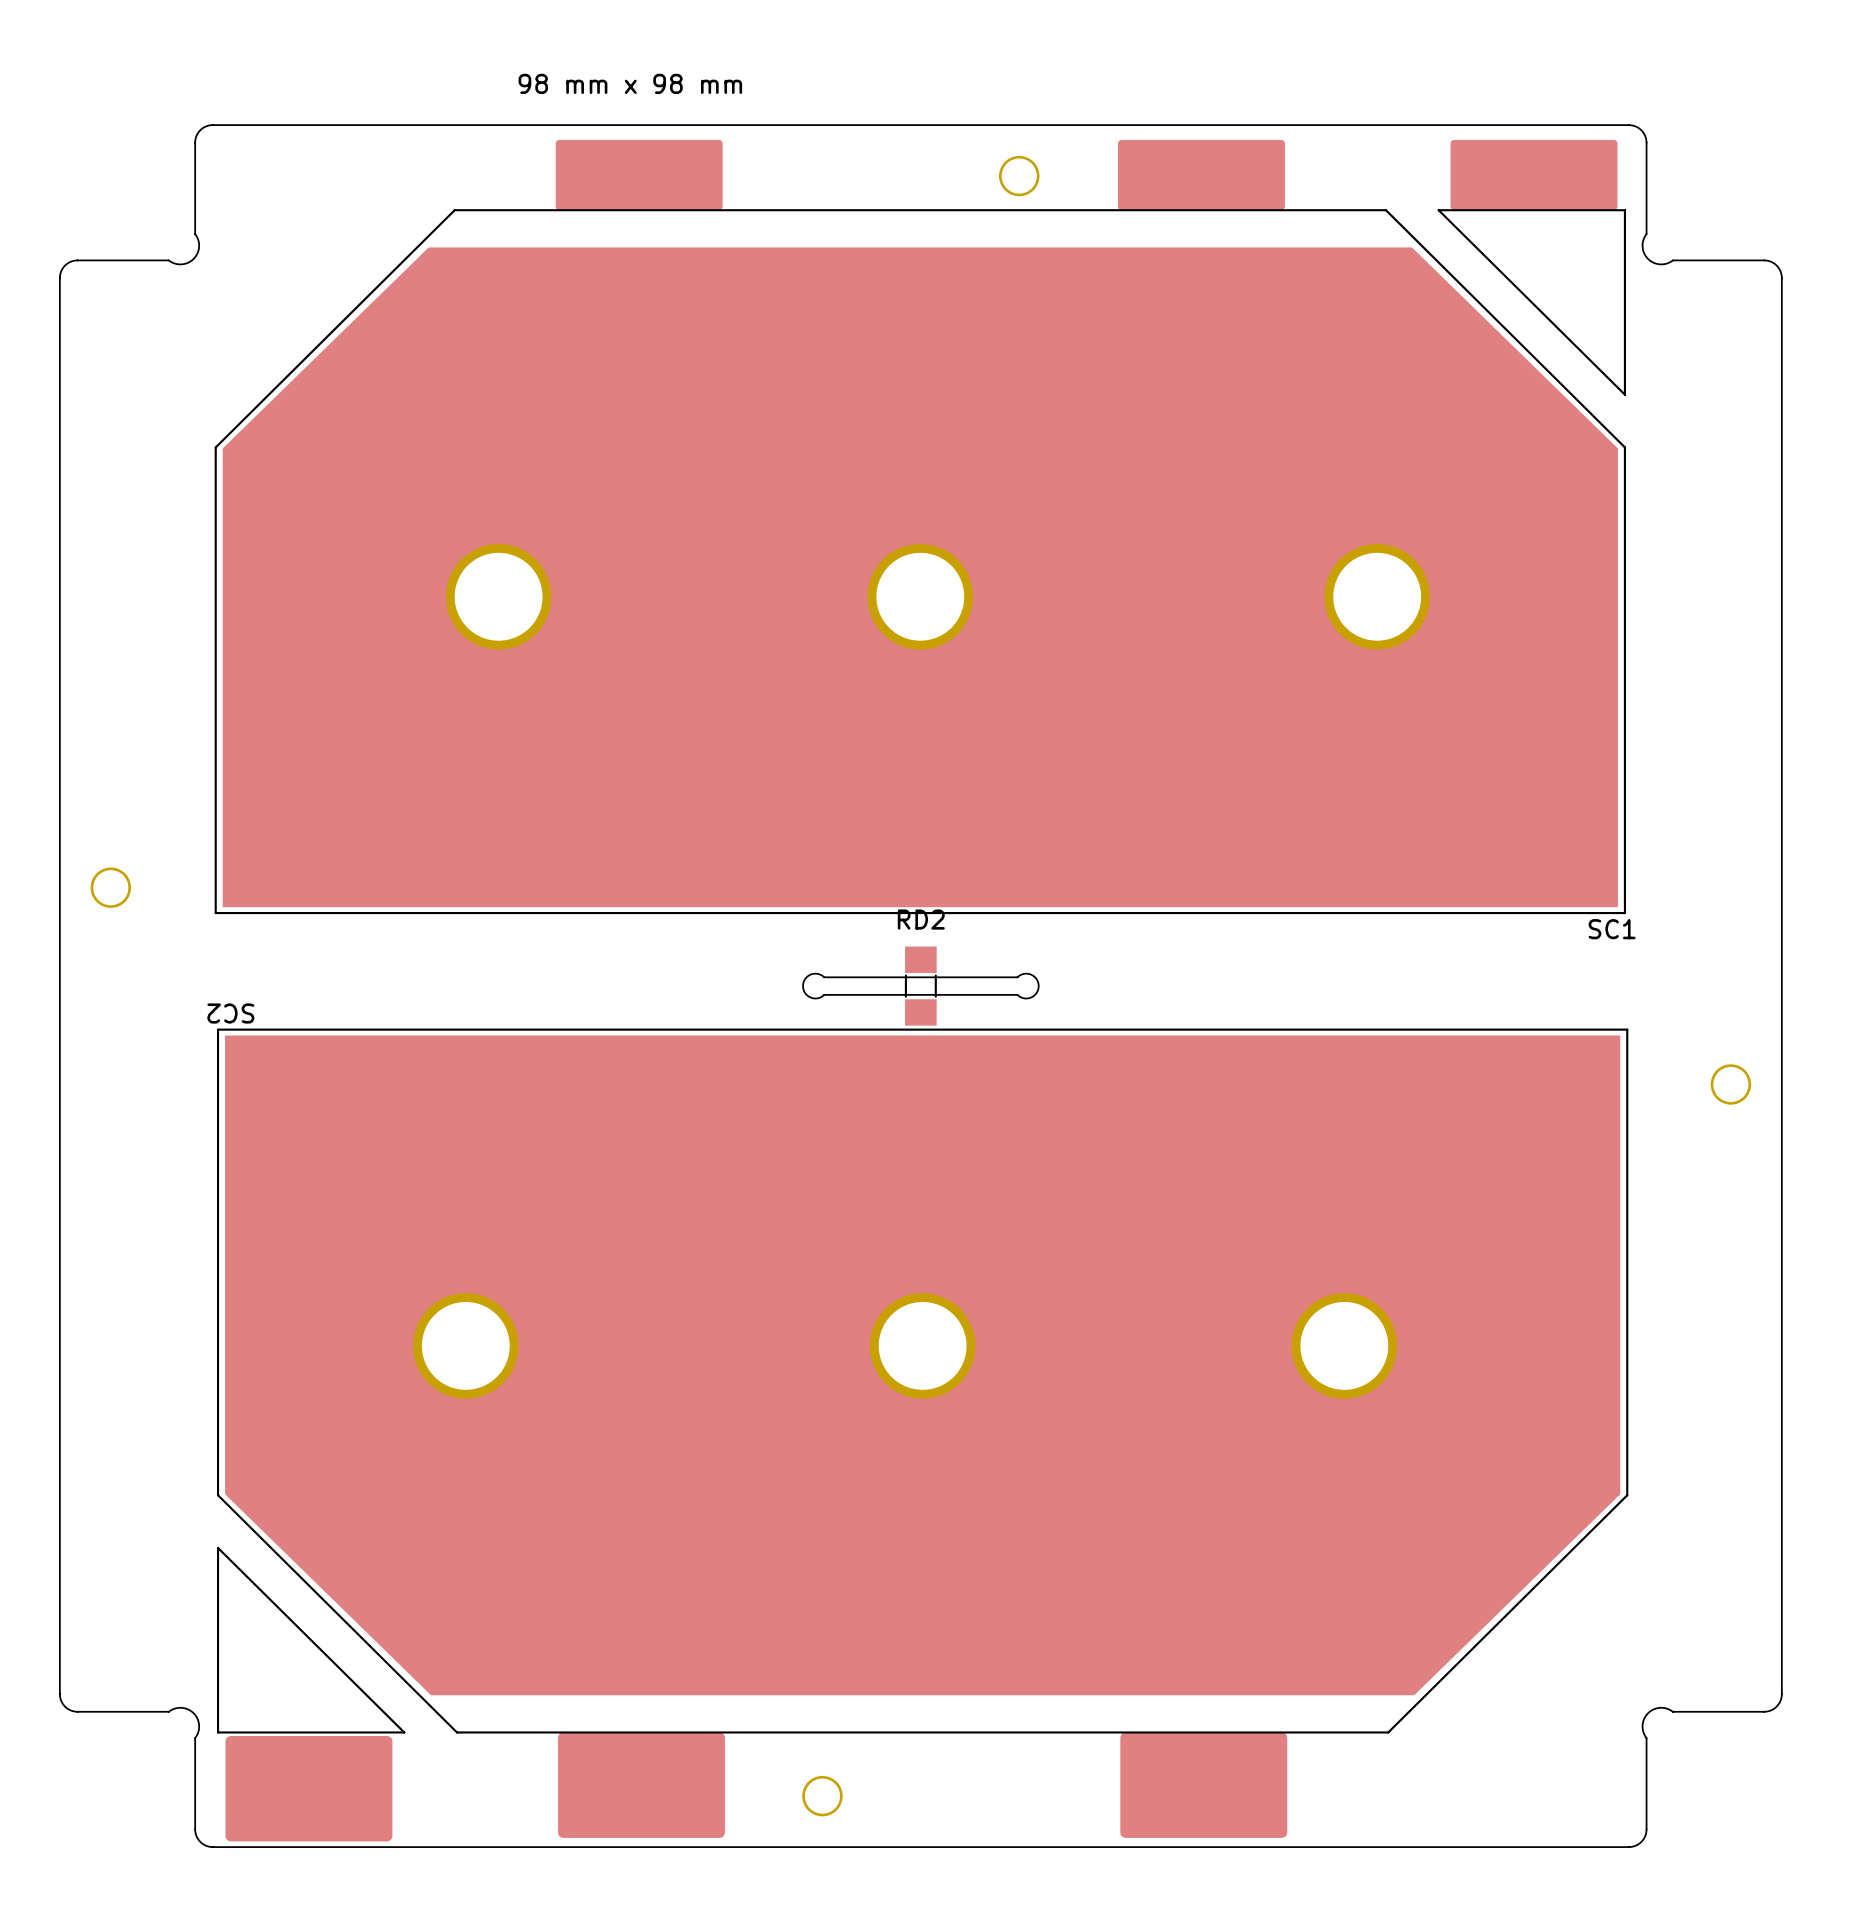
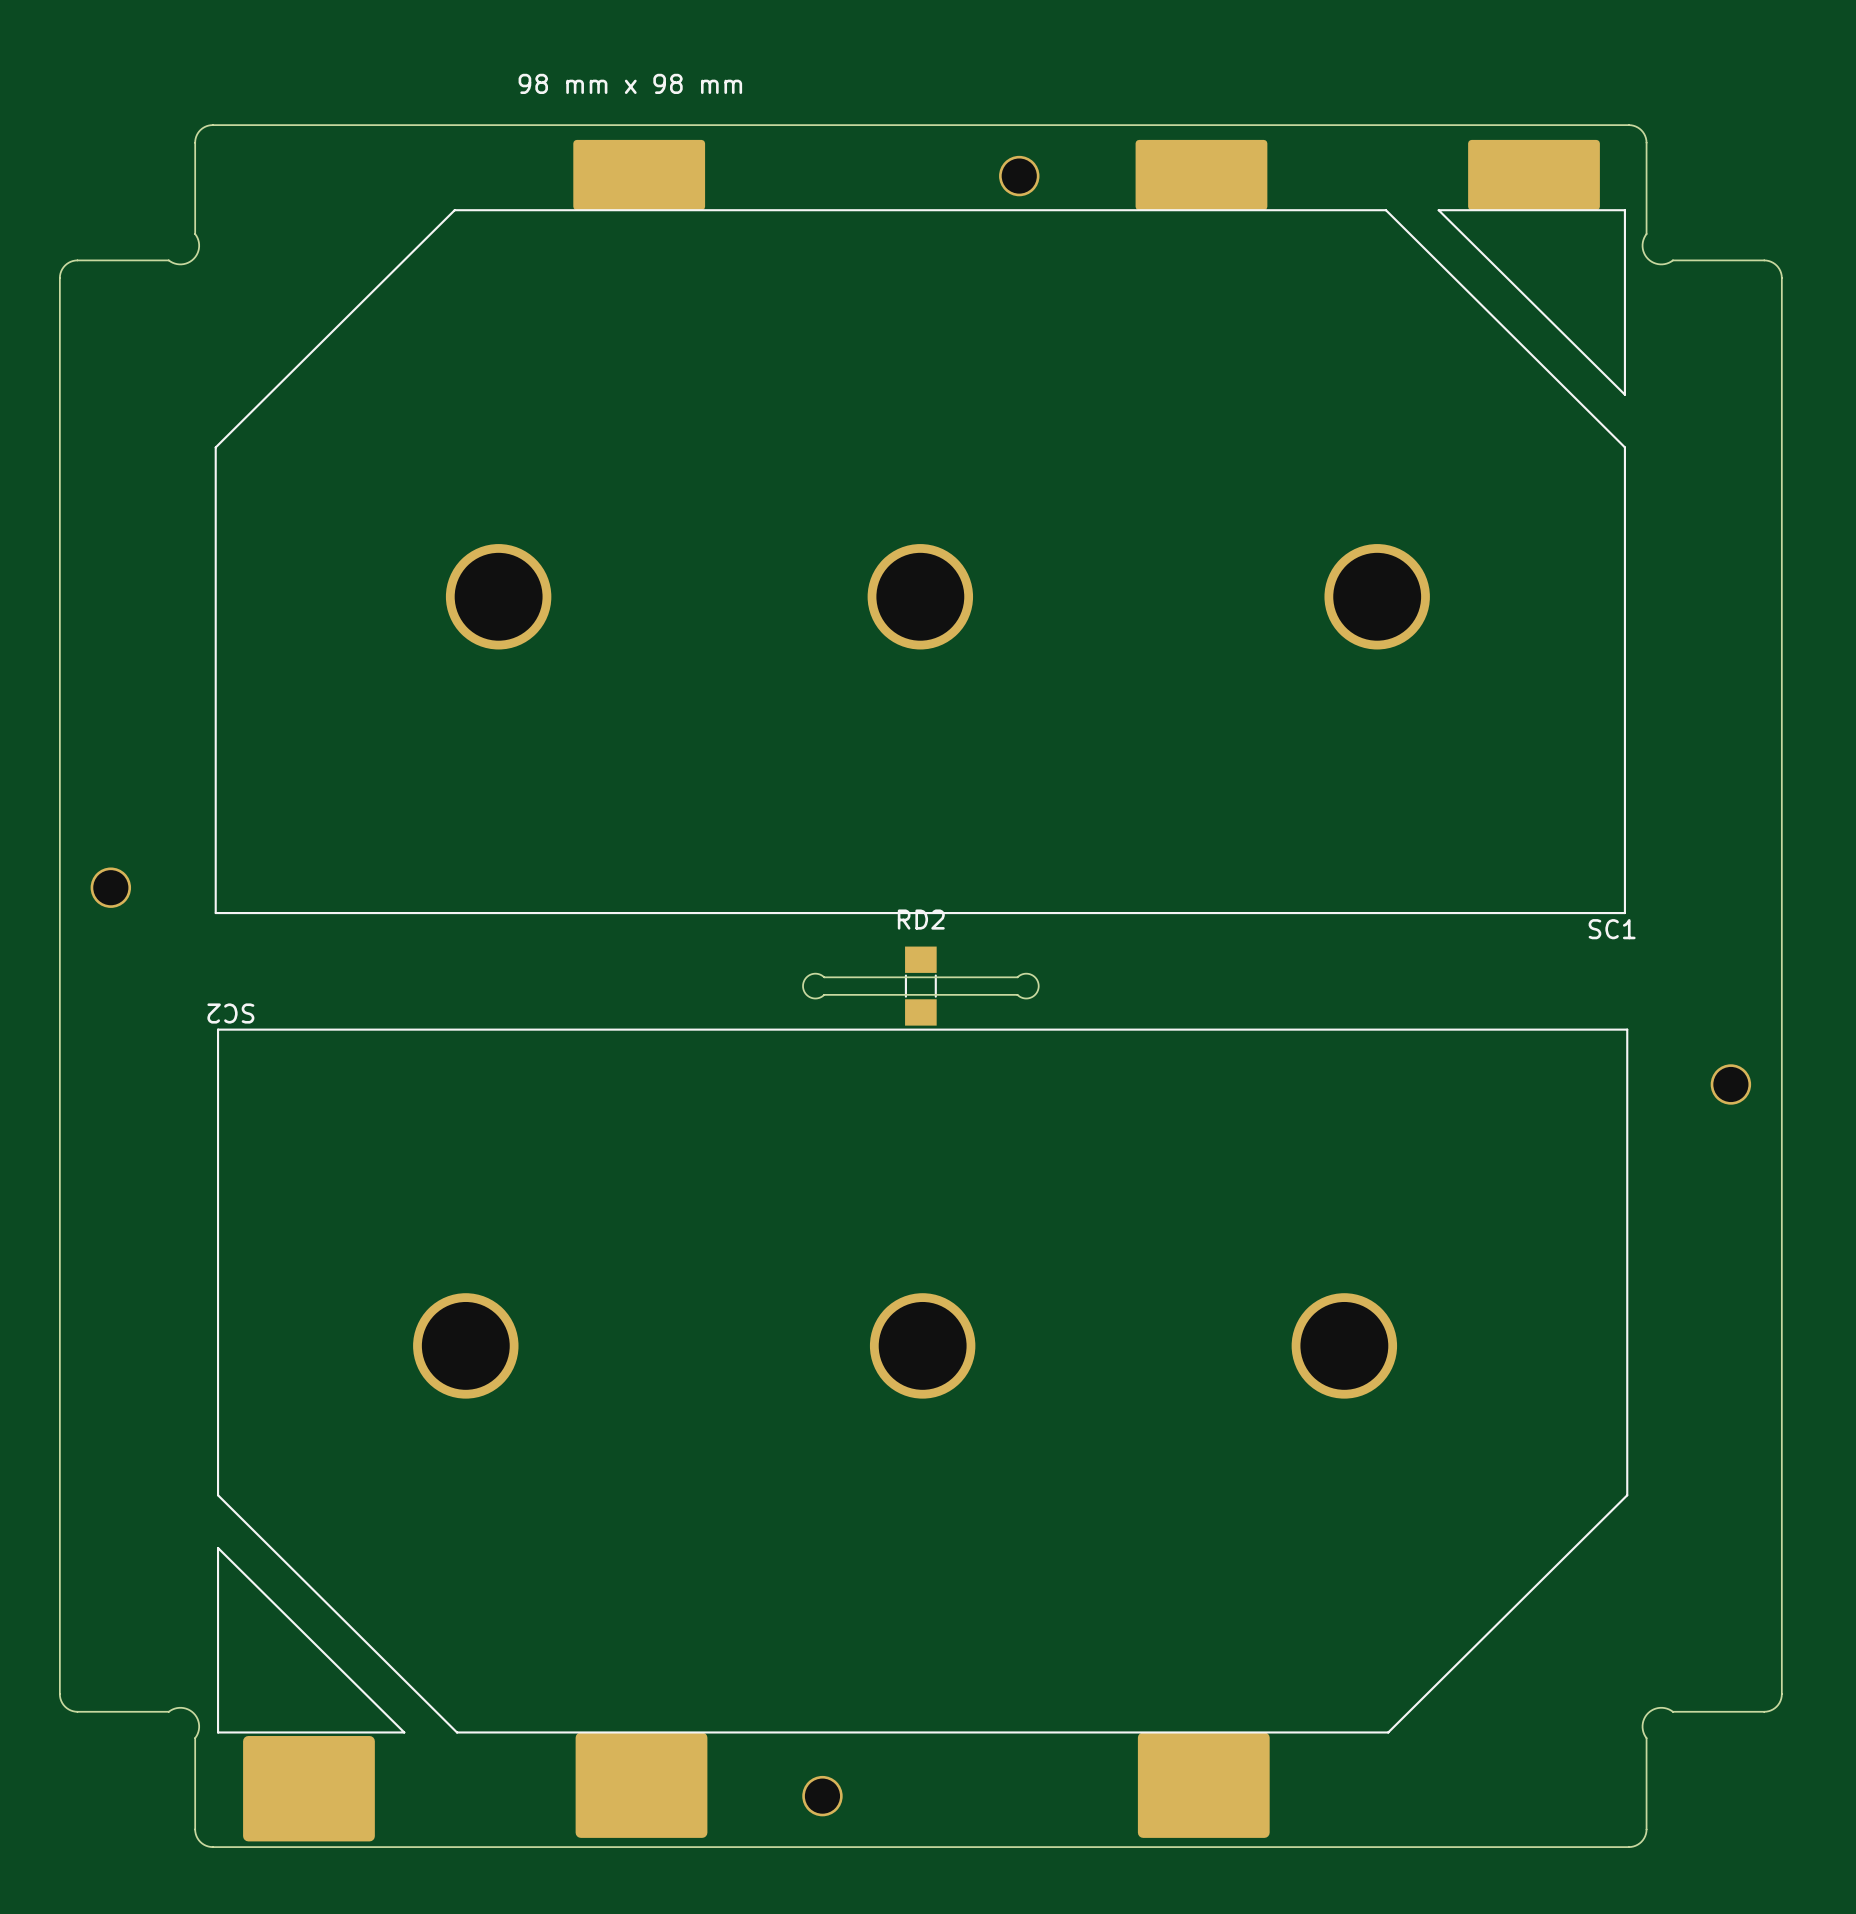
SC1 footprint: [214, 139, 1626, 915] -> [214, 139, 1626, 915]
SC2 footprint: [216, 1028, 1629, 1842] -> [216, 1028, 1629, 1842]

